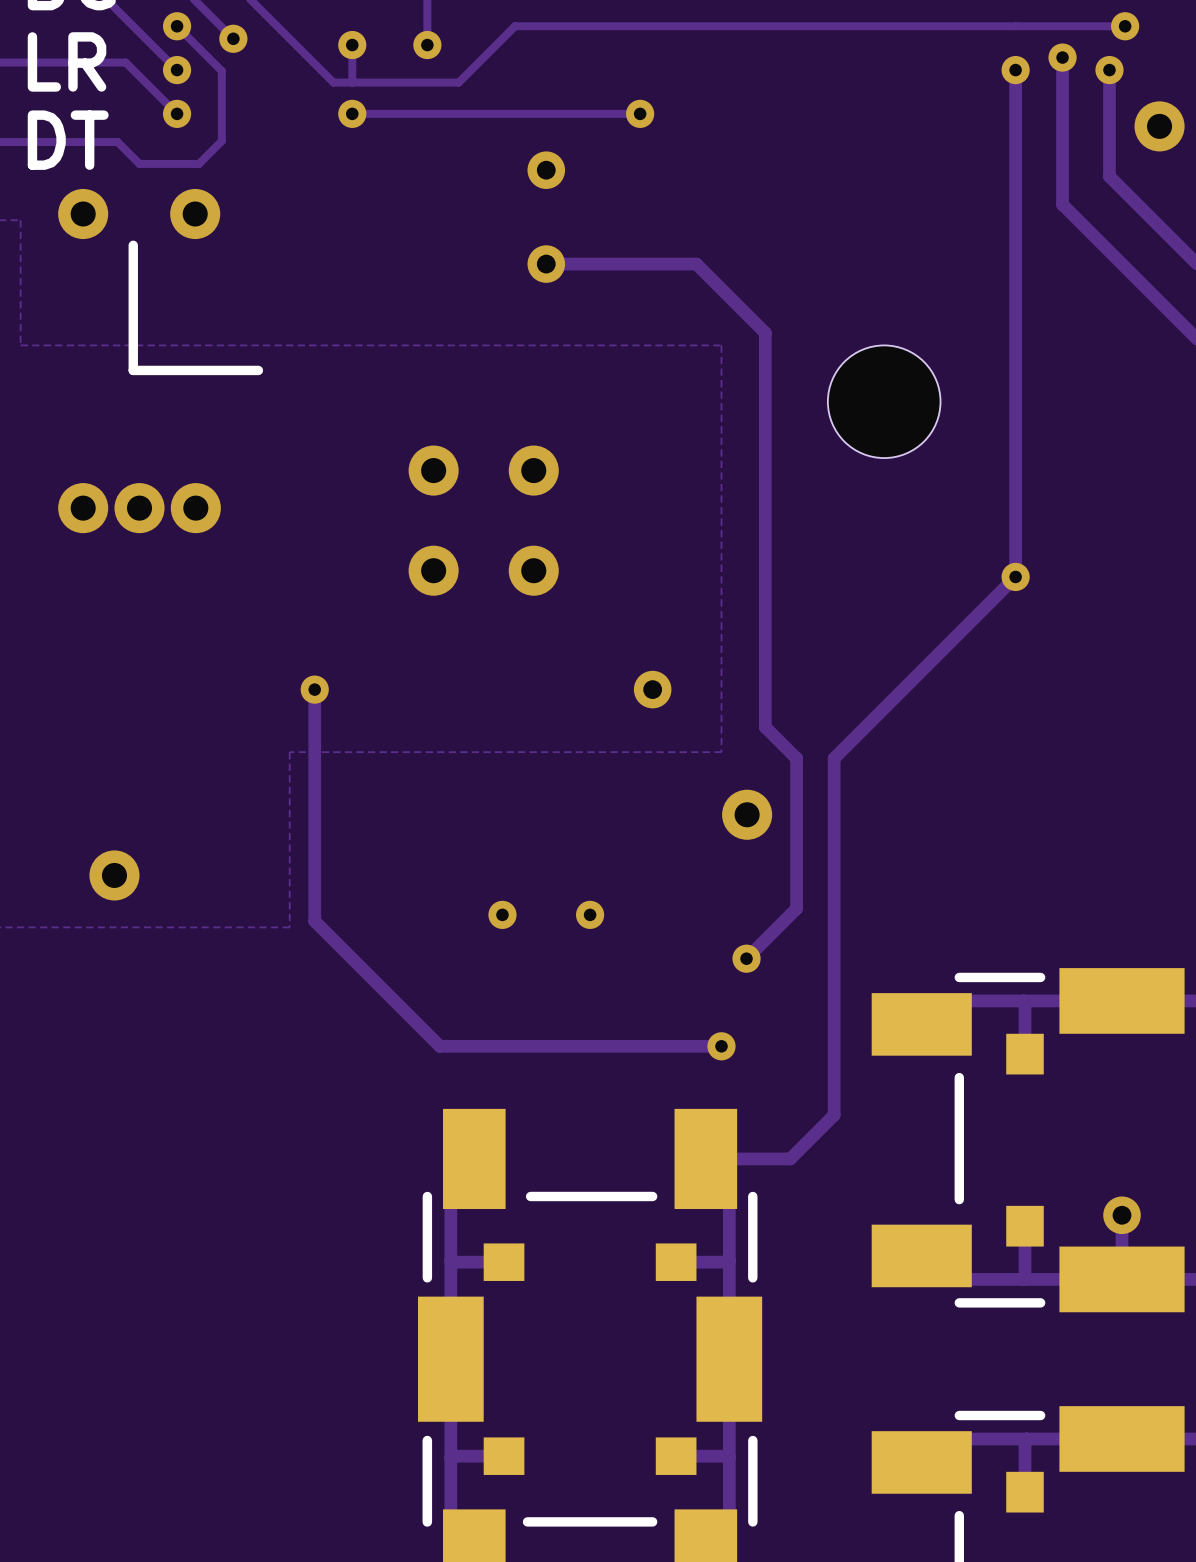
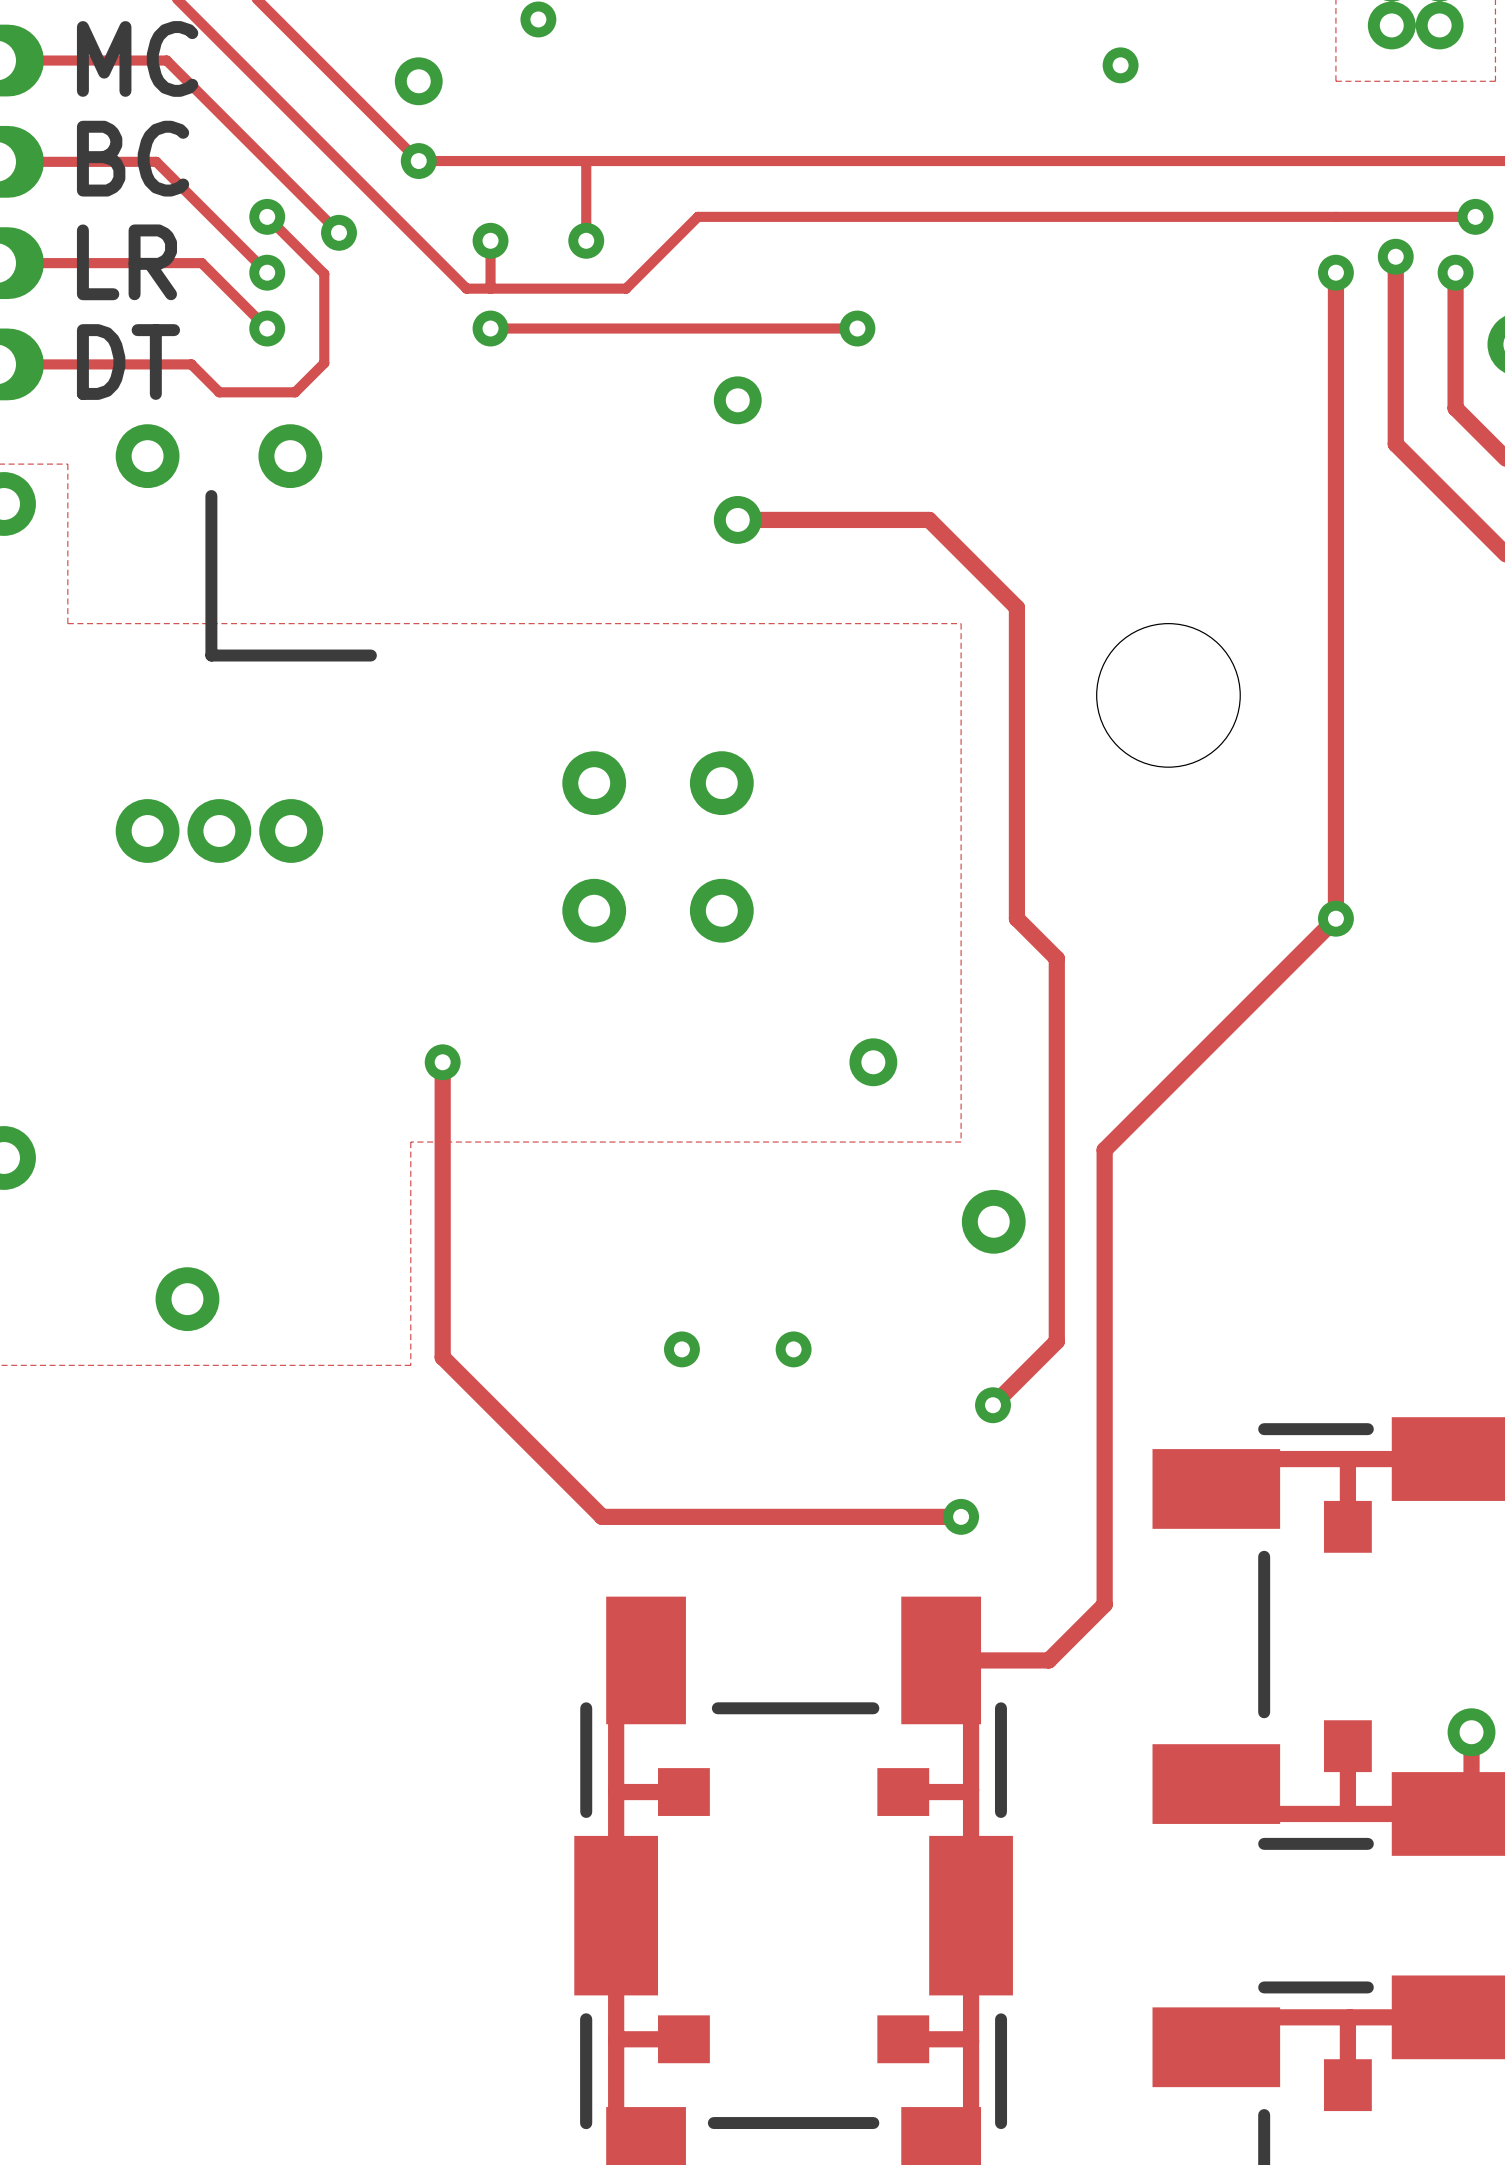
track: (765, 576) (765, 727) (796, 758) -> (1016, 918) (1056, 958) (1056, 1150)

